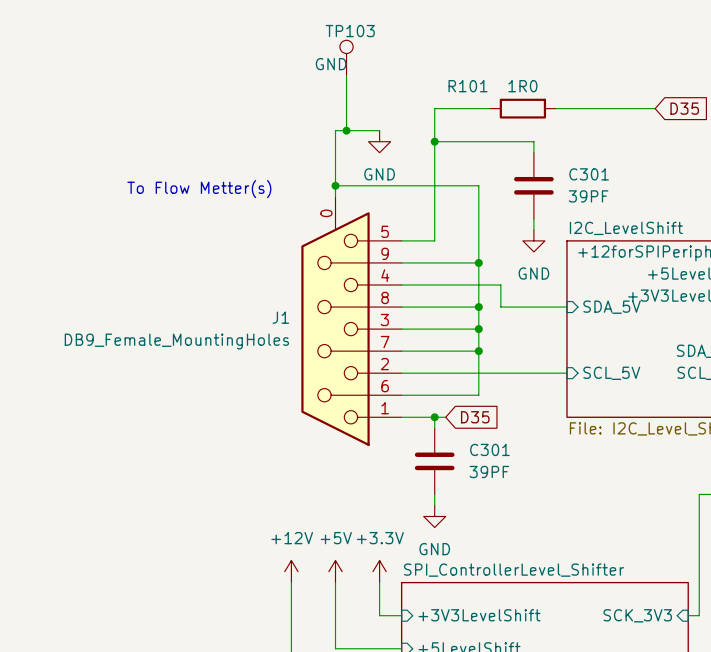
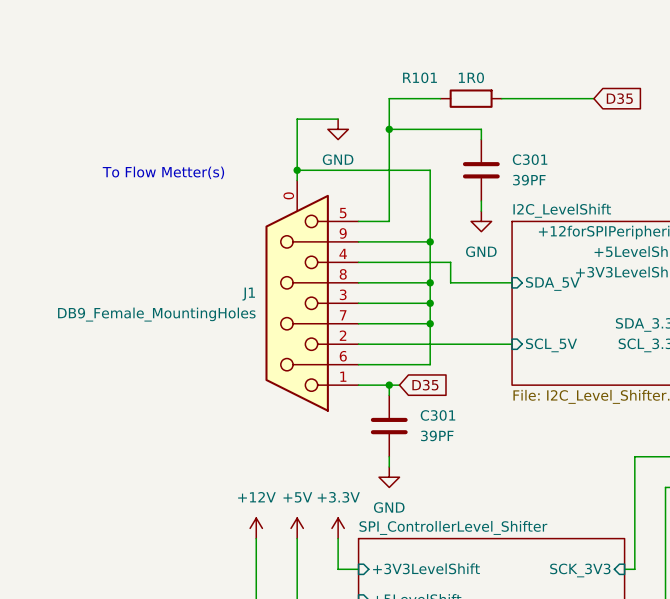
TP103: GND (346, 57) -> none
wire: (346, 75) (346, 130) -> none
junction: (346, 130) -> none

